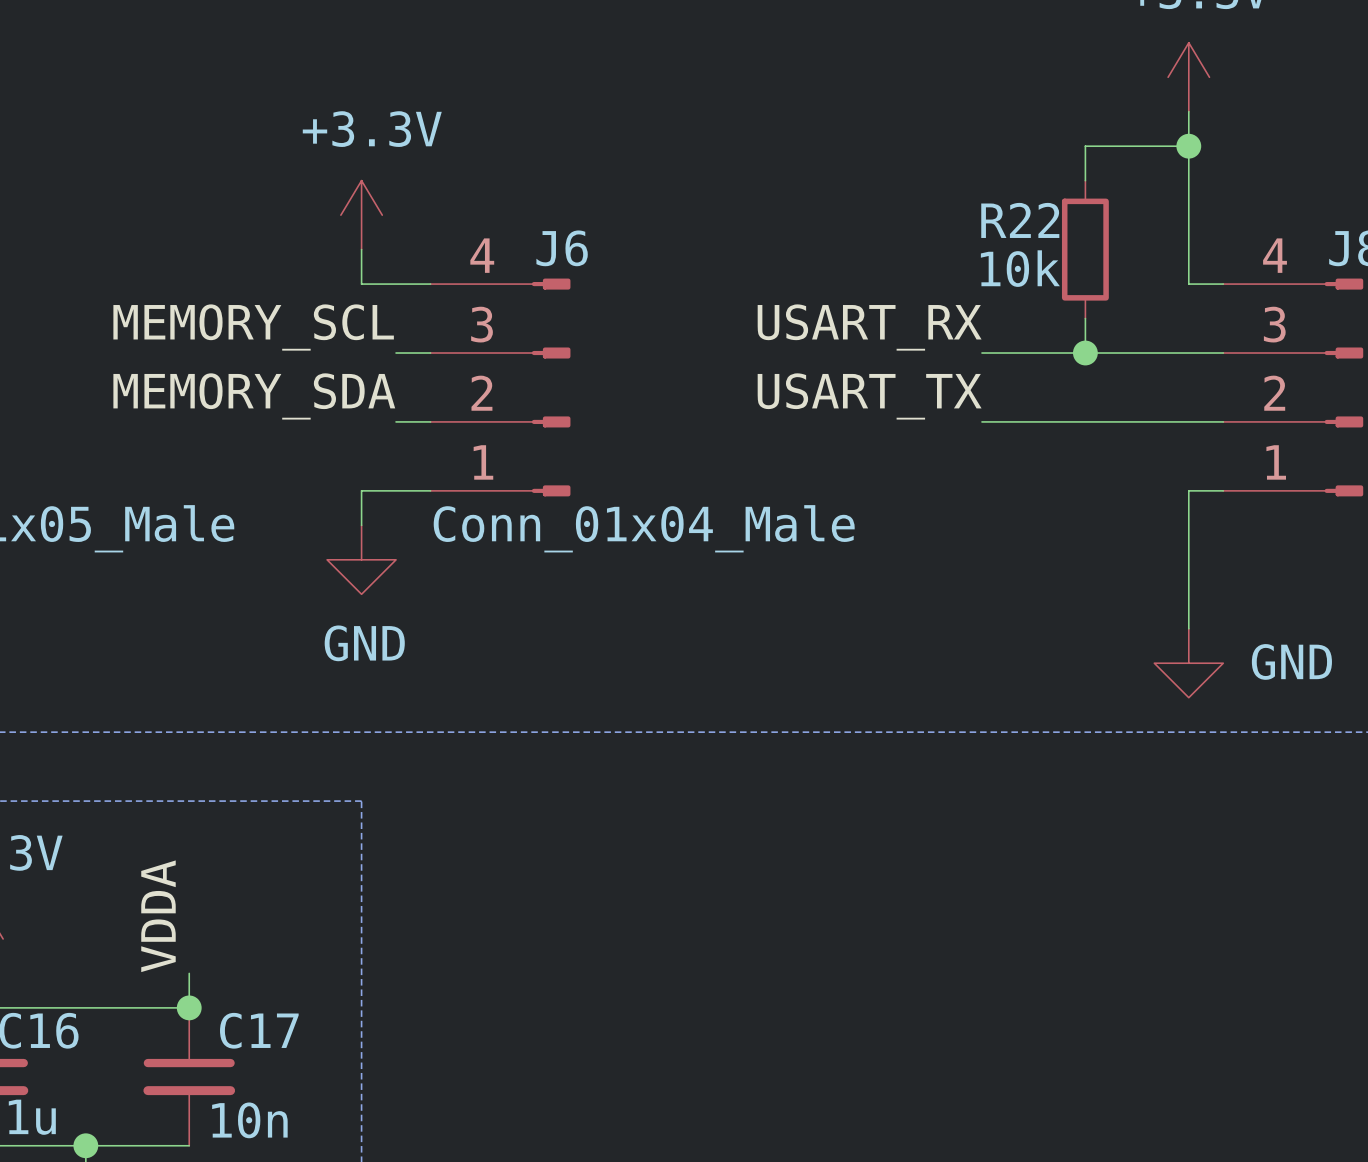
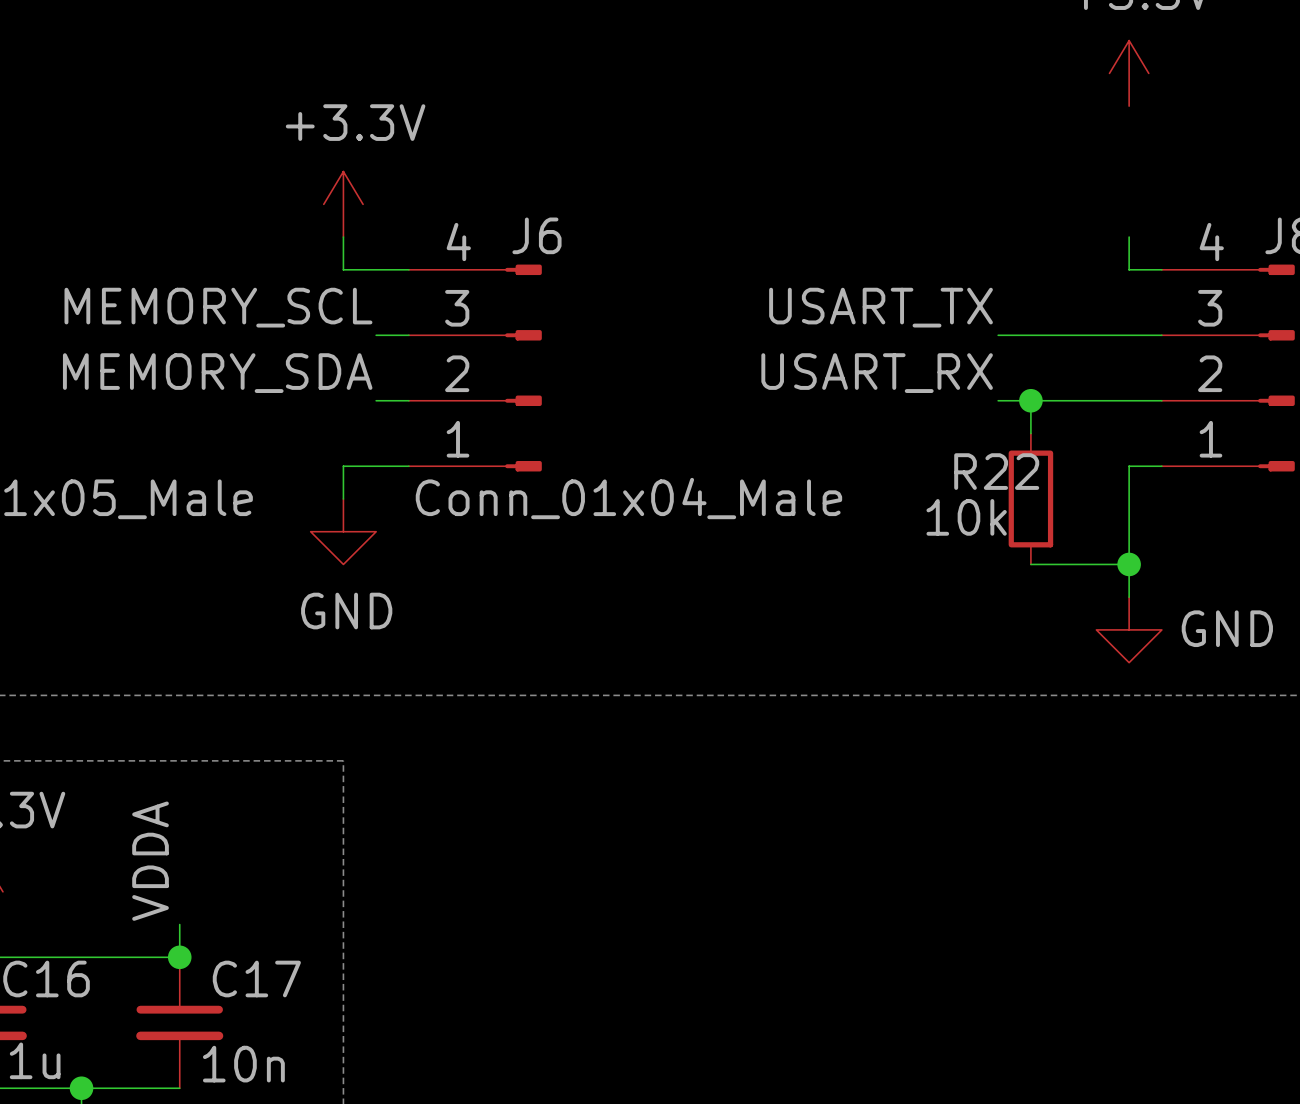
wire: (1188, 111) (1188, 249) -> none
wire: (1188, 146) (1085, 146) (1085, 180) -> none
junction: (1188, 146) -> none
R22 name position: R22 (1020, 220) -> R22 (996, 471)
R22 position: (1085, 249) -> (1030, 498)
R22 value position: 10k (1020, 268) -> 10k (966, 517)
wire: (1085, 318) (1085, 353) -> (1030, 400) (1030, 433)
label position: USART_RX (869, 327) -> USART_RX (877, 373)
wire: (981, 353) (1050, 353) -> none
junction position: (1085, 353) -> (1030, 400)
label position: USART_TX (869, 396) -> USART_TX (881, 307)
wire: (981, 421) (1050, 421) -> none
wire: none -> (1030, 564) (1129, 564)
junction: none -> (1129, 564)

